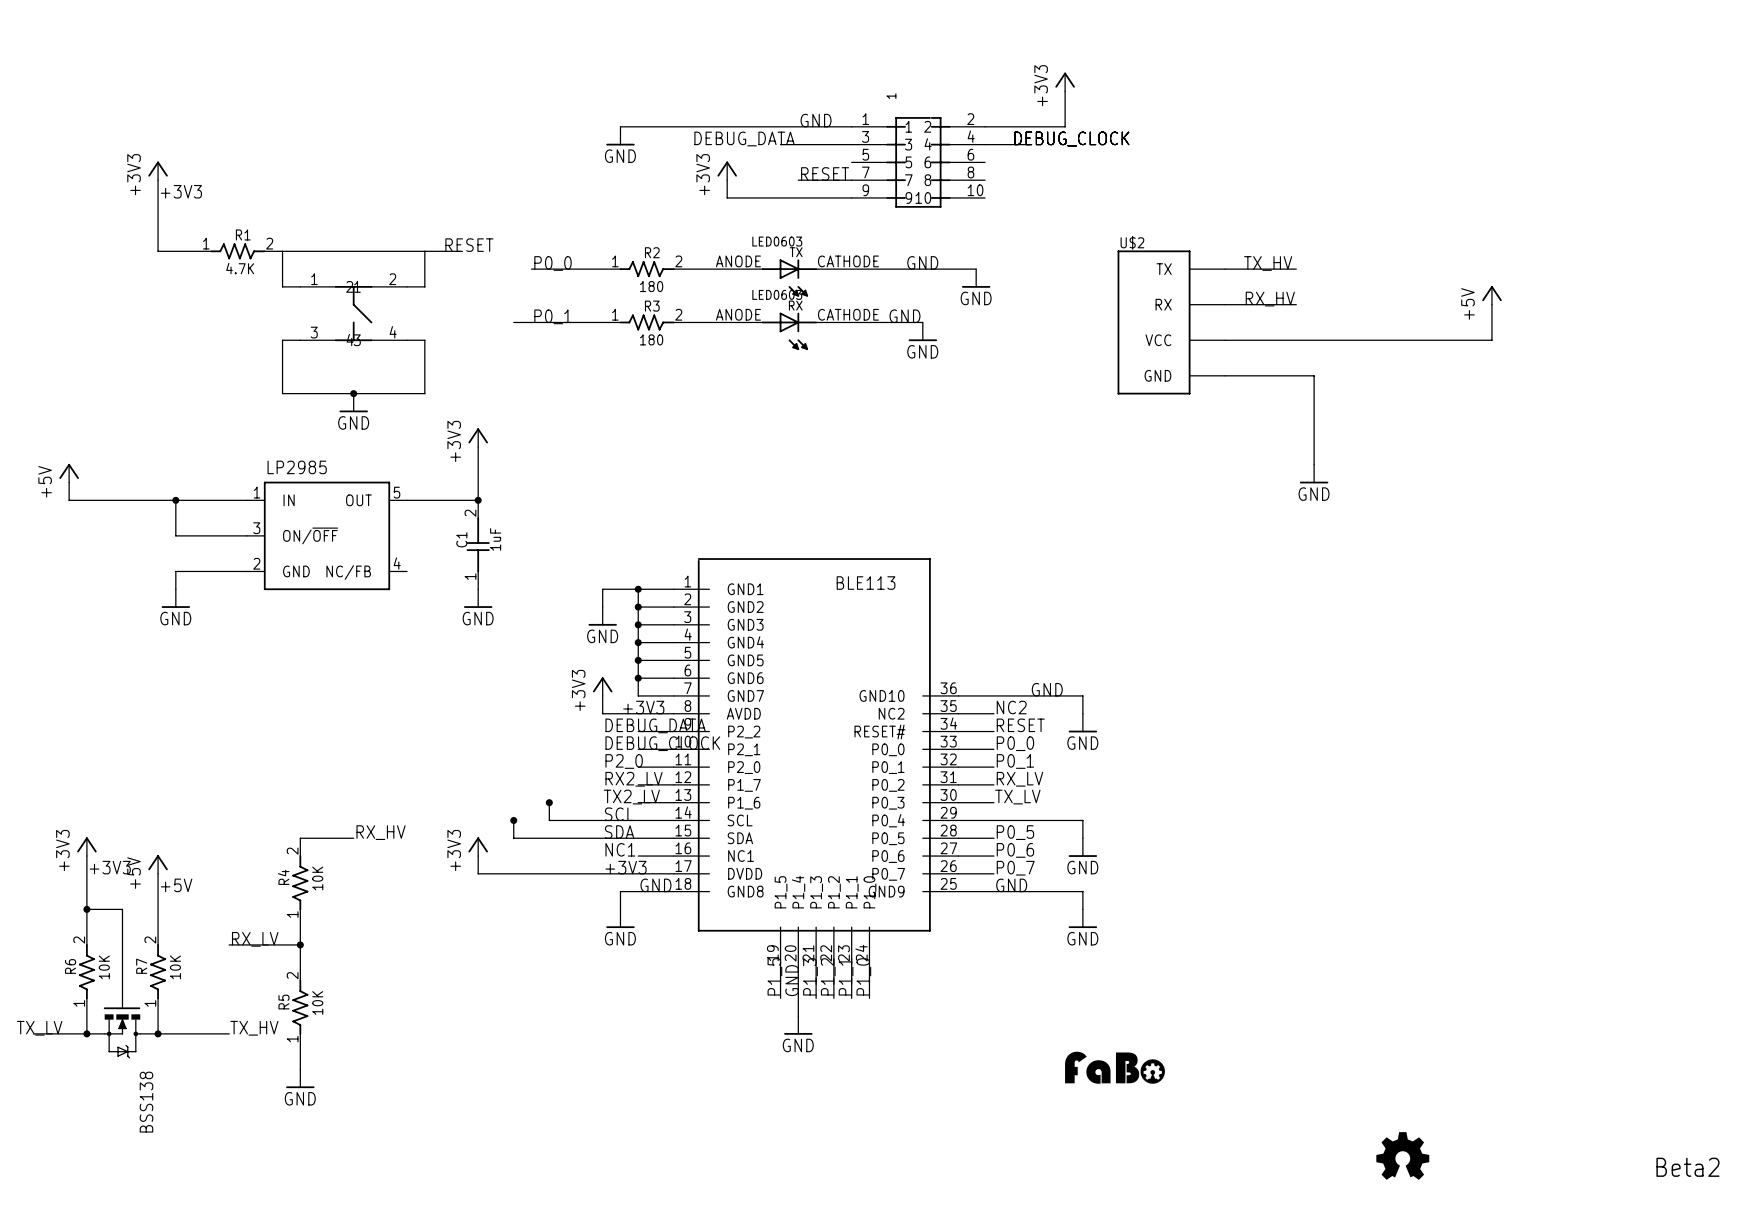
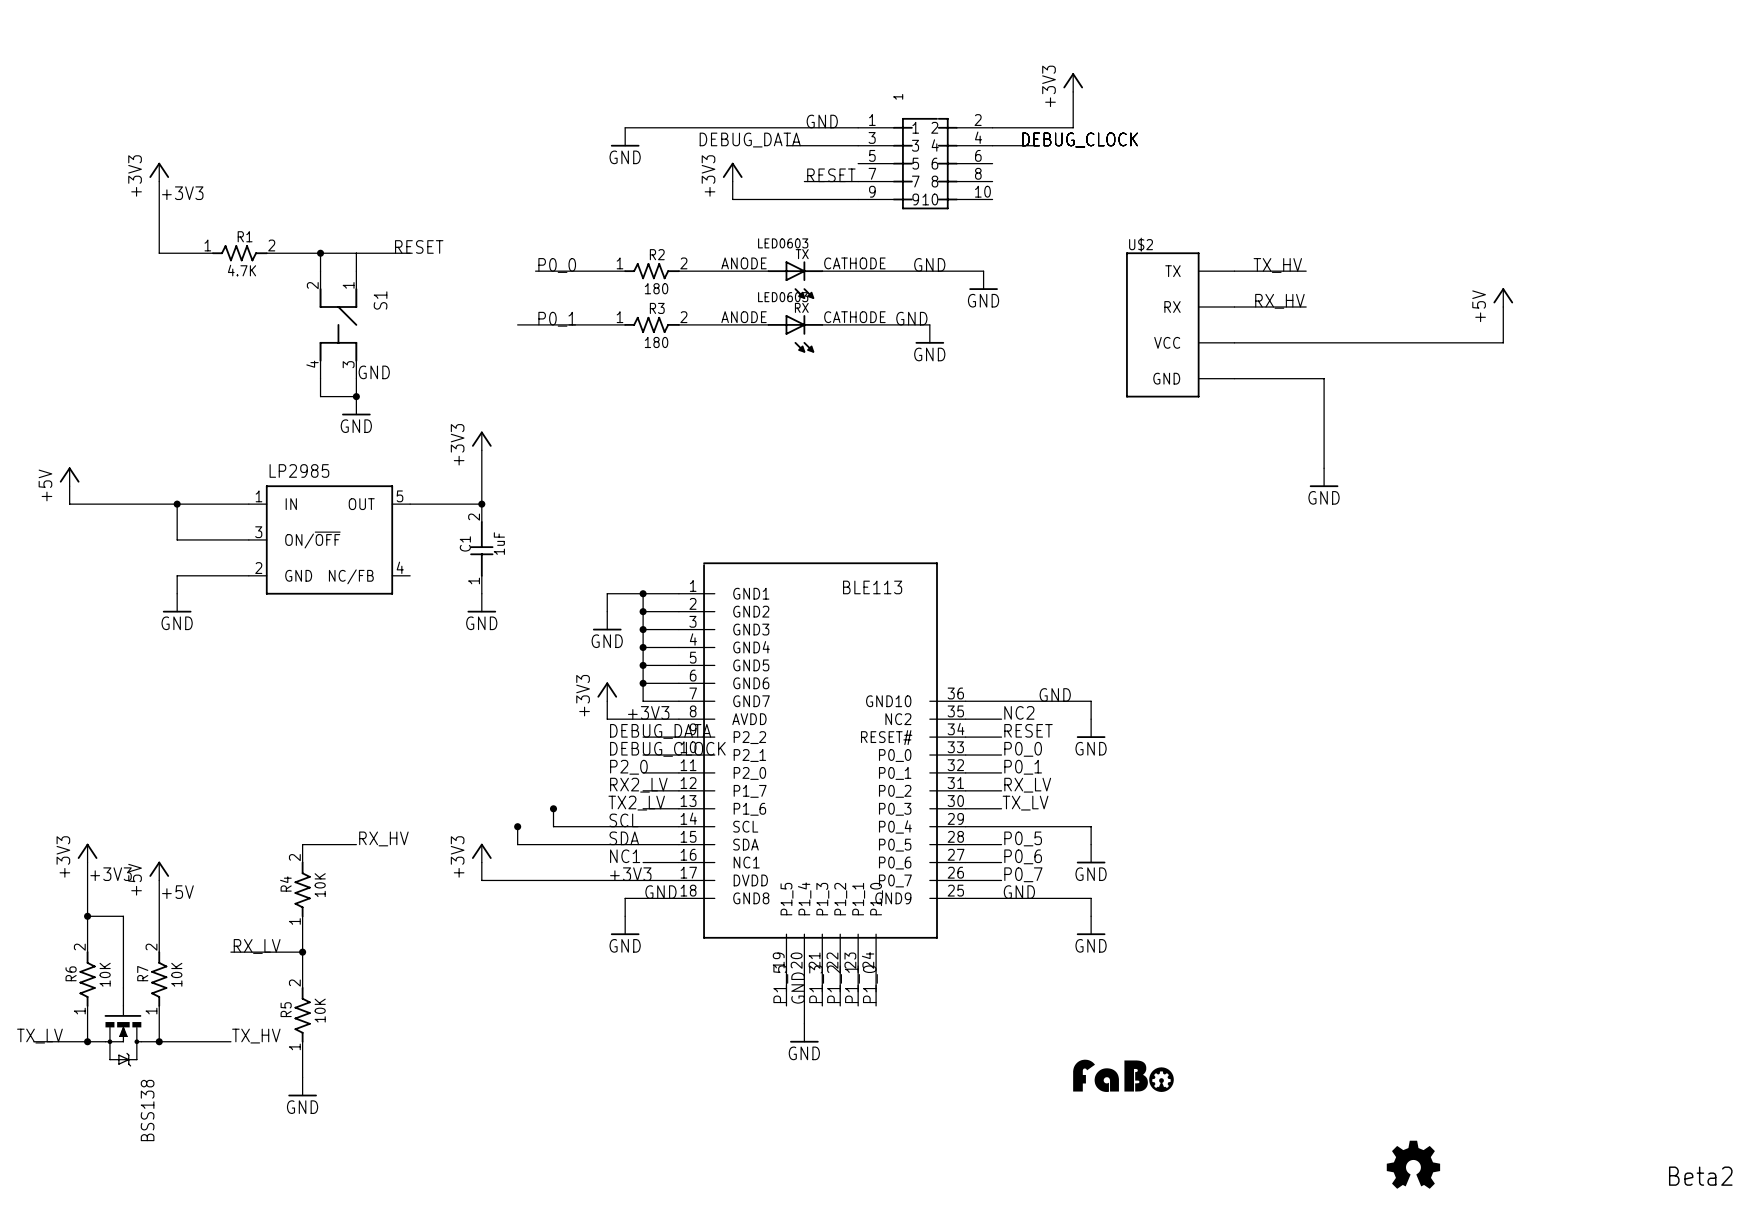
label position: RESET (469, 245) -> RESET (419, 246)
wire: (282, 251) (282, 286) (300, 286) -> none
wire: none -> (320, 253) (320, 271)
junction: none -> (320, 253)
wire: none -> (356, 253) (356, 271)
wire: (407, 251) (460, 251) -> none
wire: (424, 251) (424, 286) (407, 286) -> none
part: (353, 313) -> none
S1: none -> (338, 324)
wire: (300, 340) (282, 340) (282, 393) (318, 393) -> (320, 378) (320, 396)
wire: (407, 340) (424, 340) (424, 393) (353, 393) -> (356, 378) (356, 396)
label: none -> GND (374, 372)

